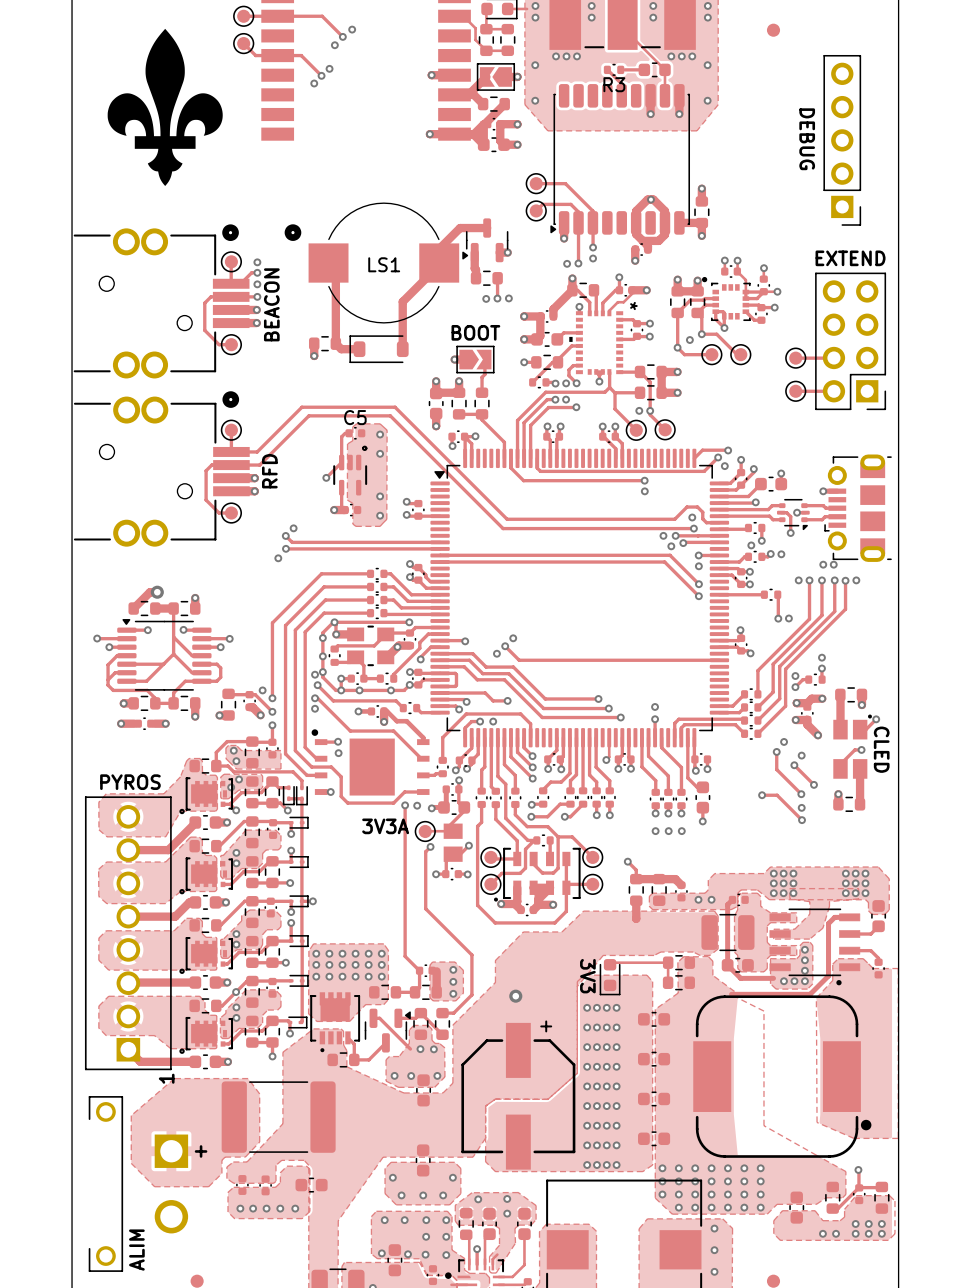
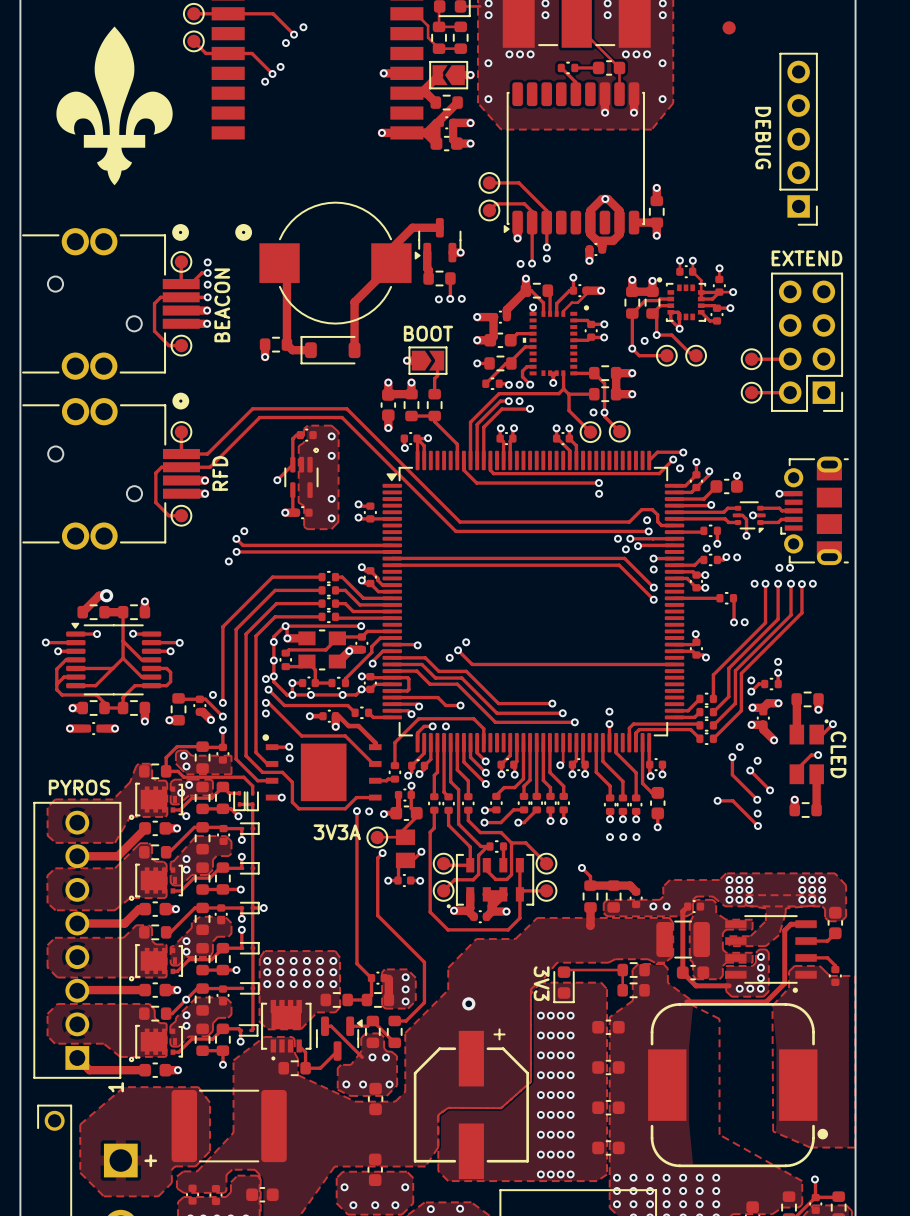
R3 name: R3 (614, 84) -> none
LS1 name: LS1 (384, 264) -> none
part footprint: [569, 310, 624, 375] -> [522, 305, 590, 377]
C5 name: C5 (355, 417) -> none

